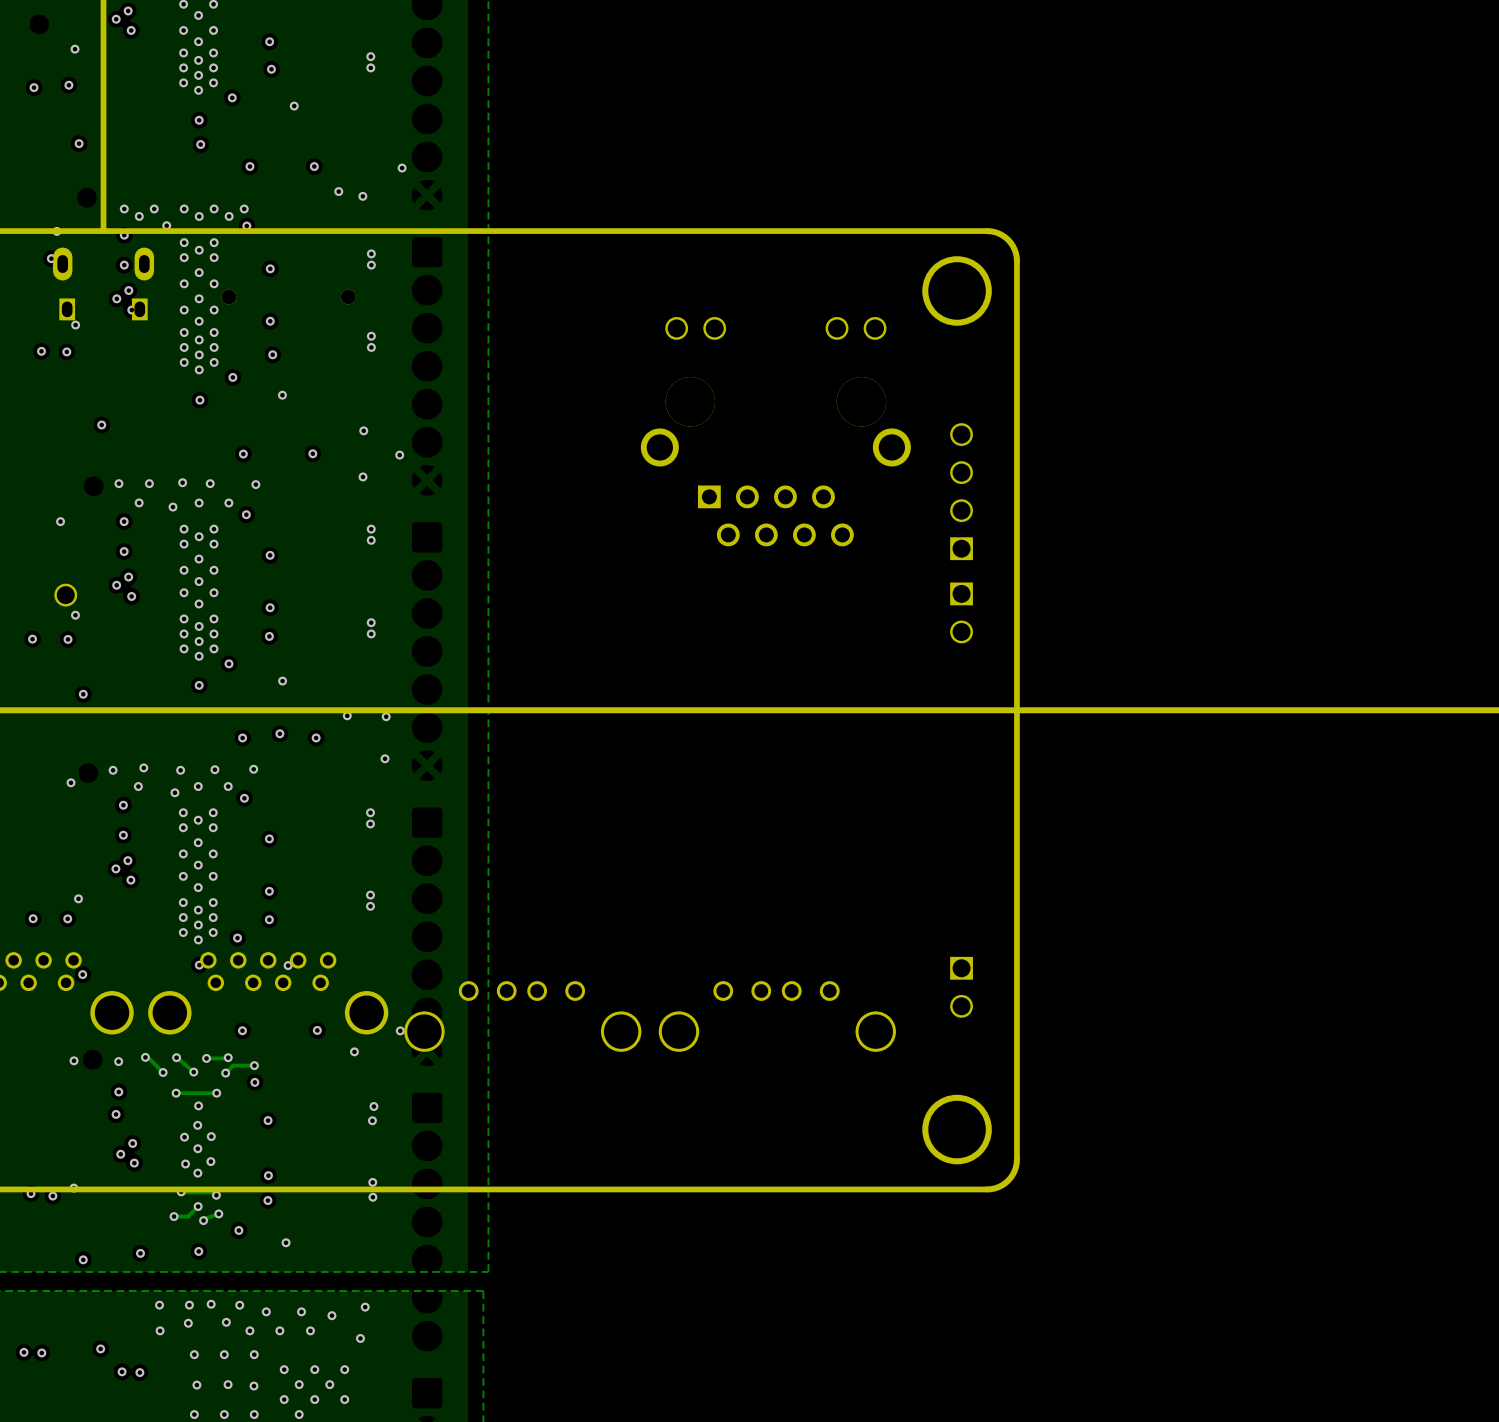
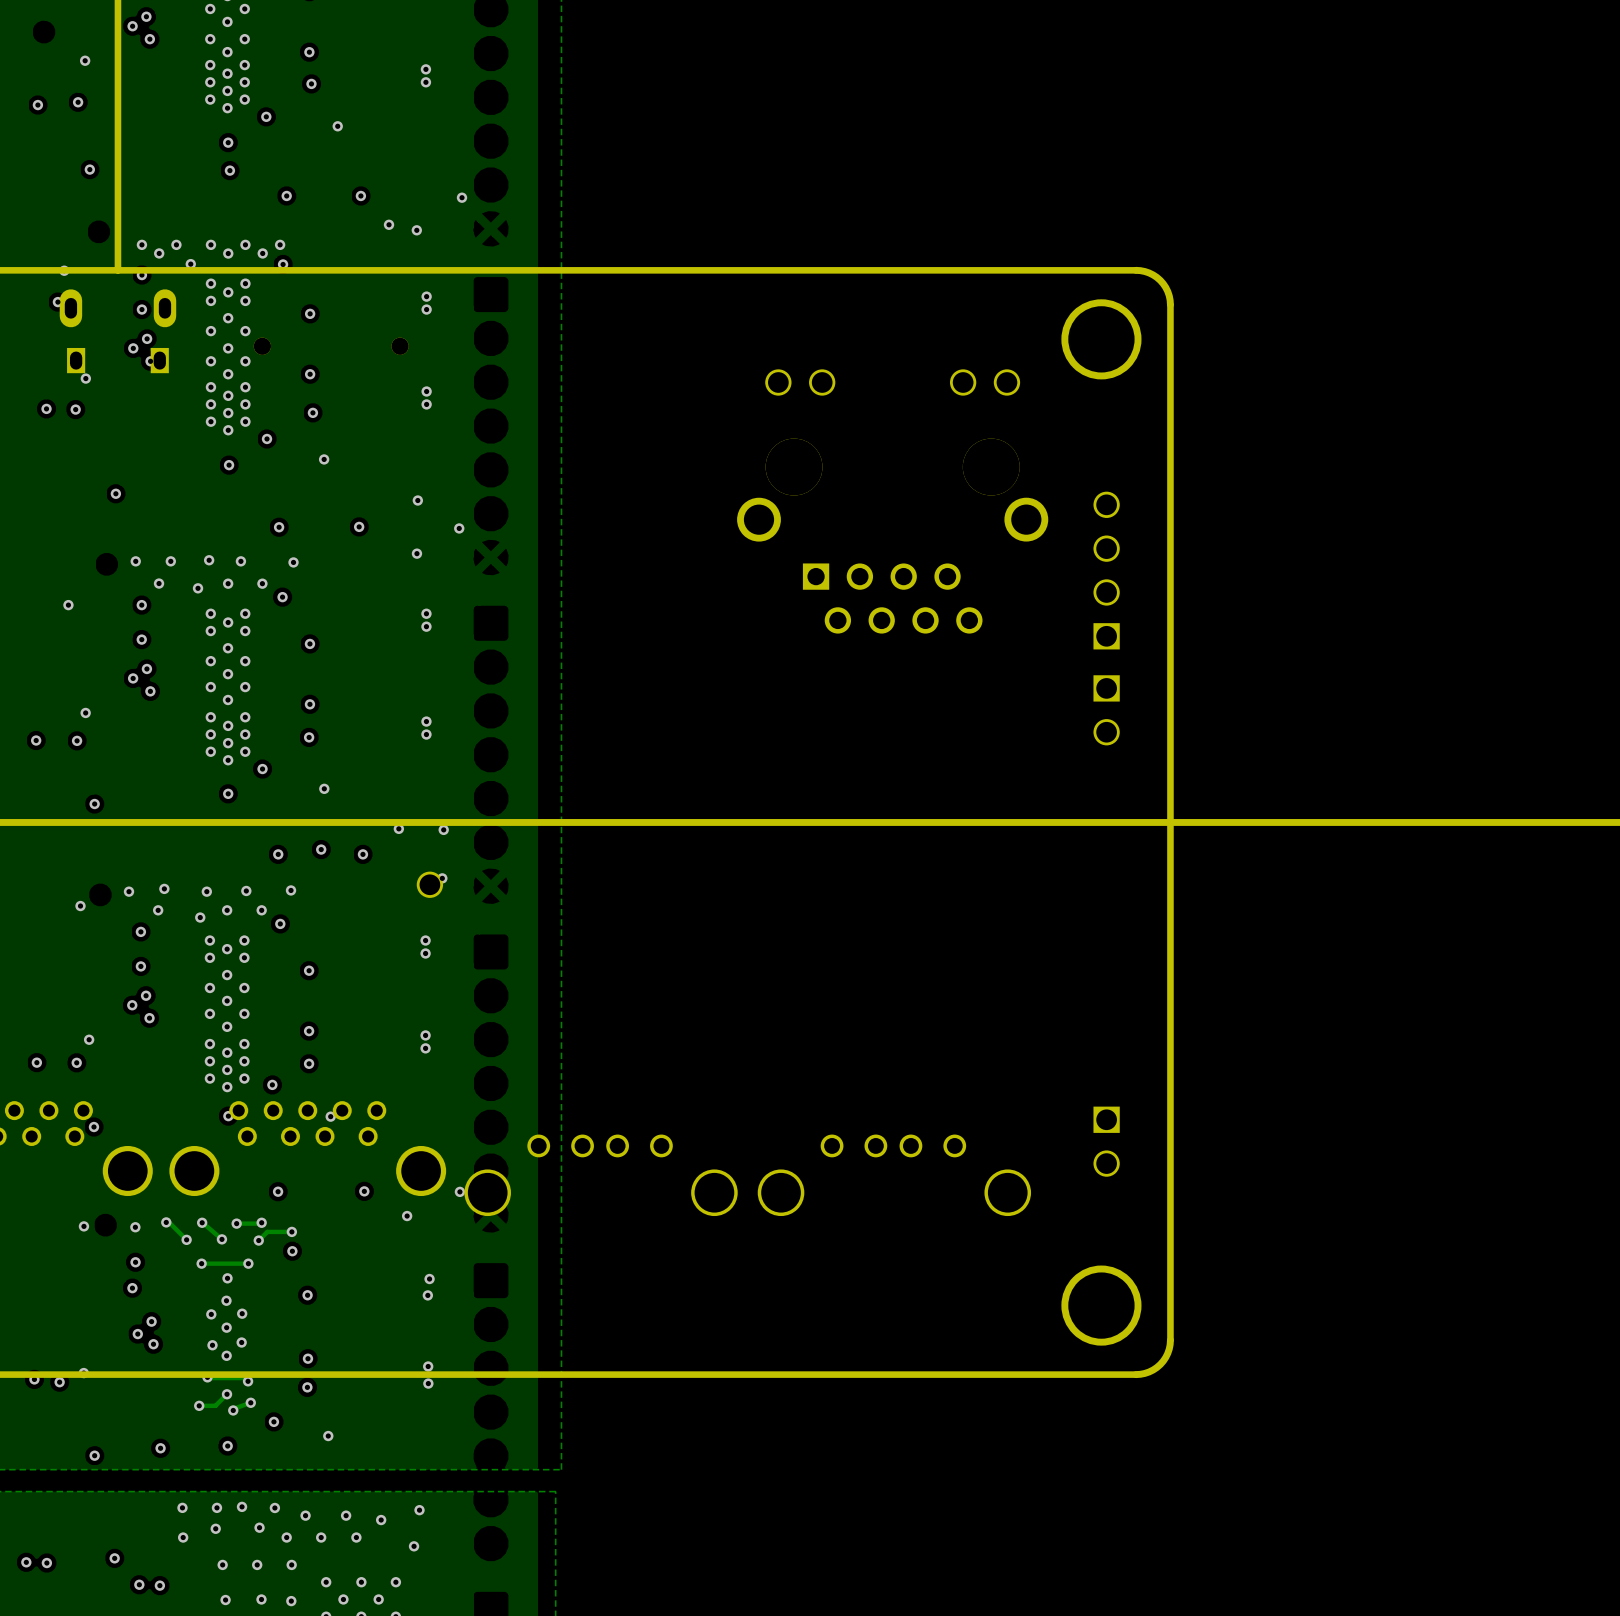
part position: (65, 595) -> (429, 884)

